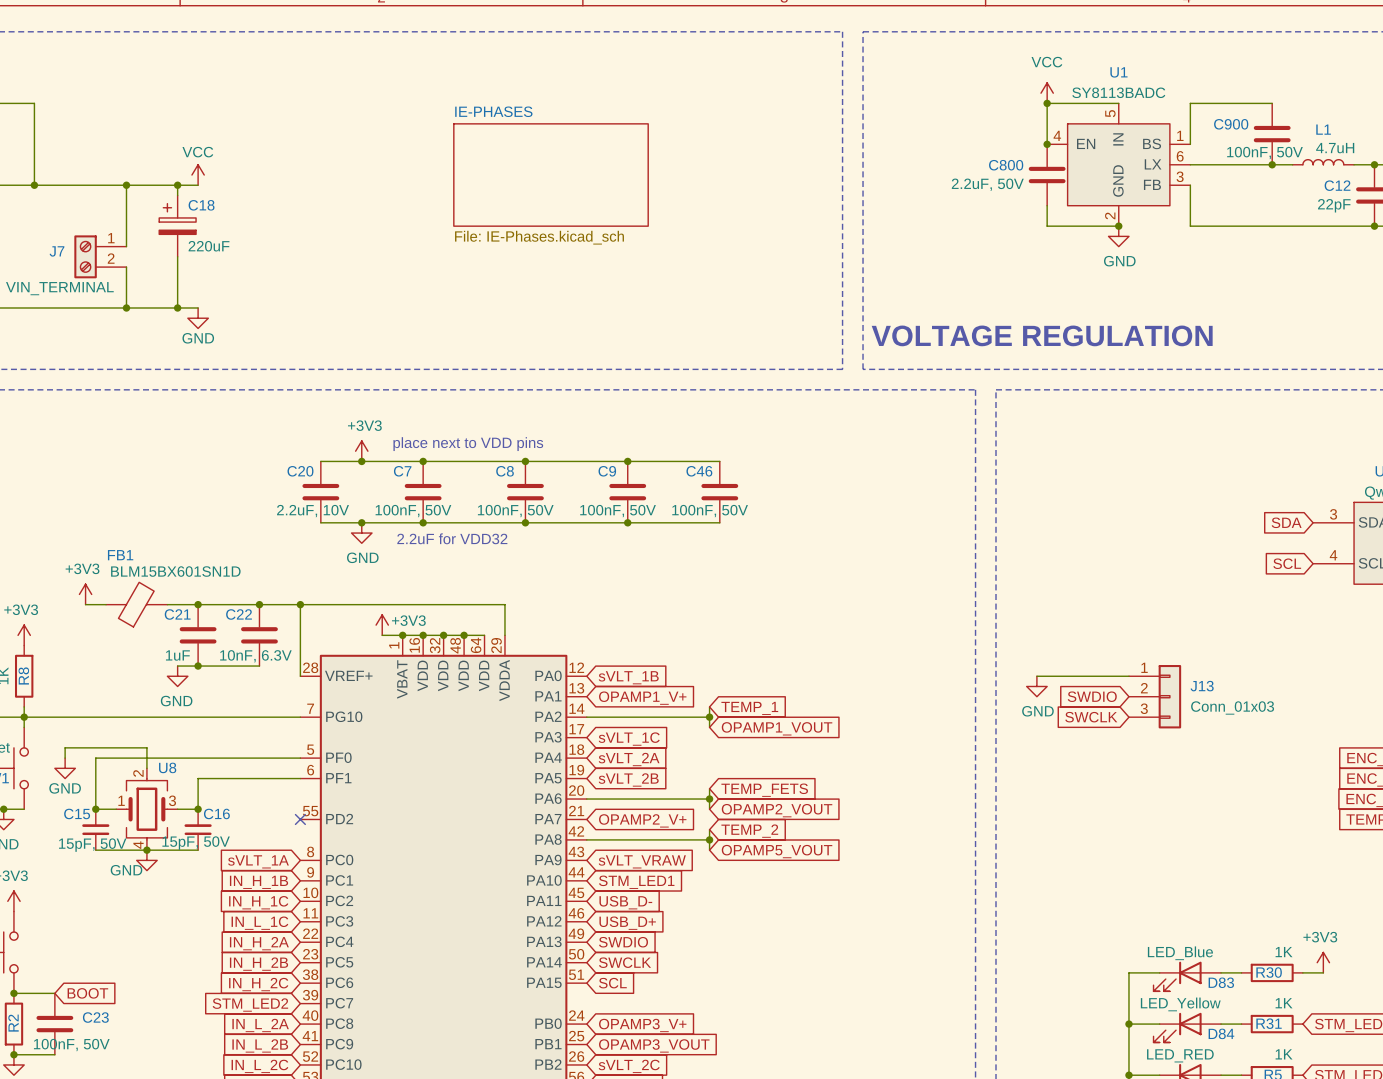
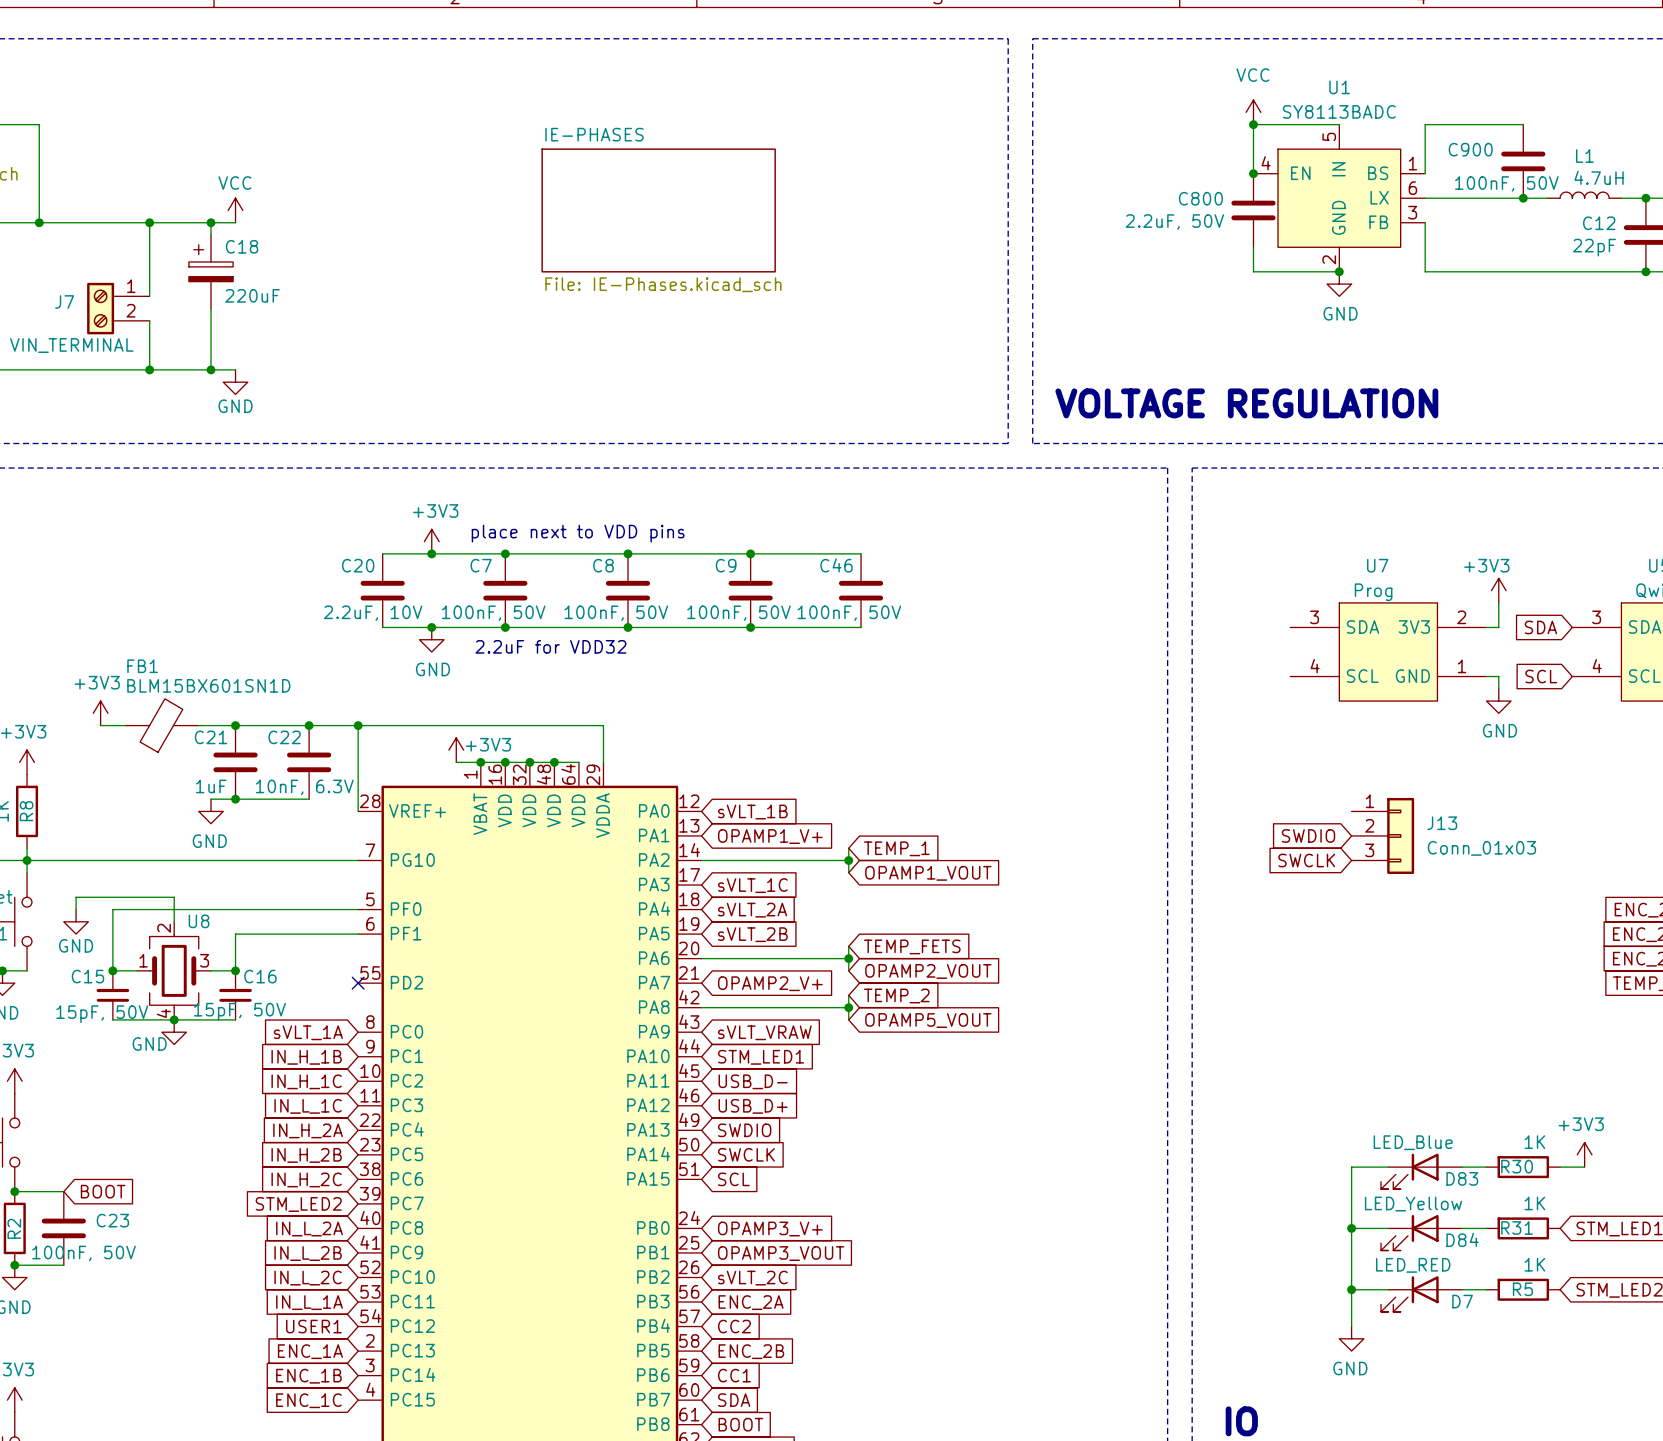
power symbol: none -> +3V3 (1498, 590)
wire: none -> (1498, 602) (1498, 627) (1486, 627)
U7: none -> Prog (1388, 652)
wire: none -> (1486, 676) (1498, 676) (1498, 688)
power symbol: none -> GND (1498, 701)
wire: (1036, 676) (1128, 676) -> none
power symbol: GND (1036, 686) -> none

